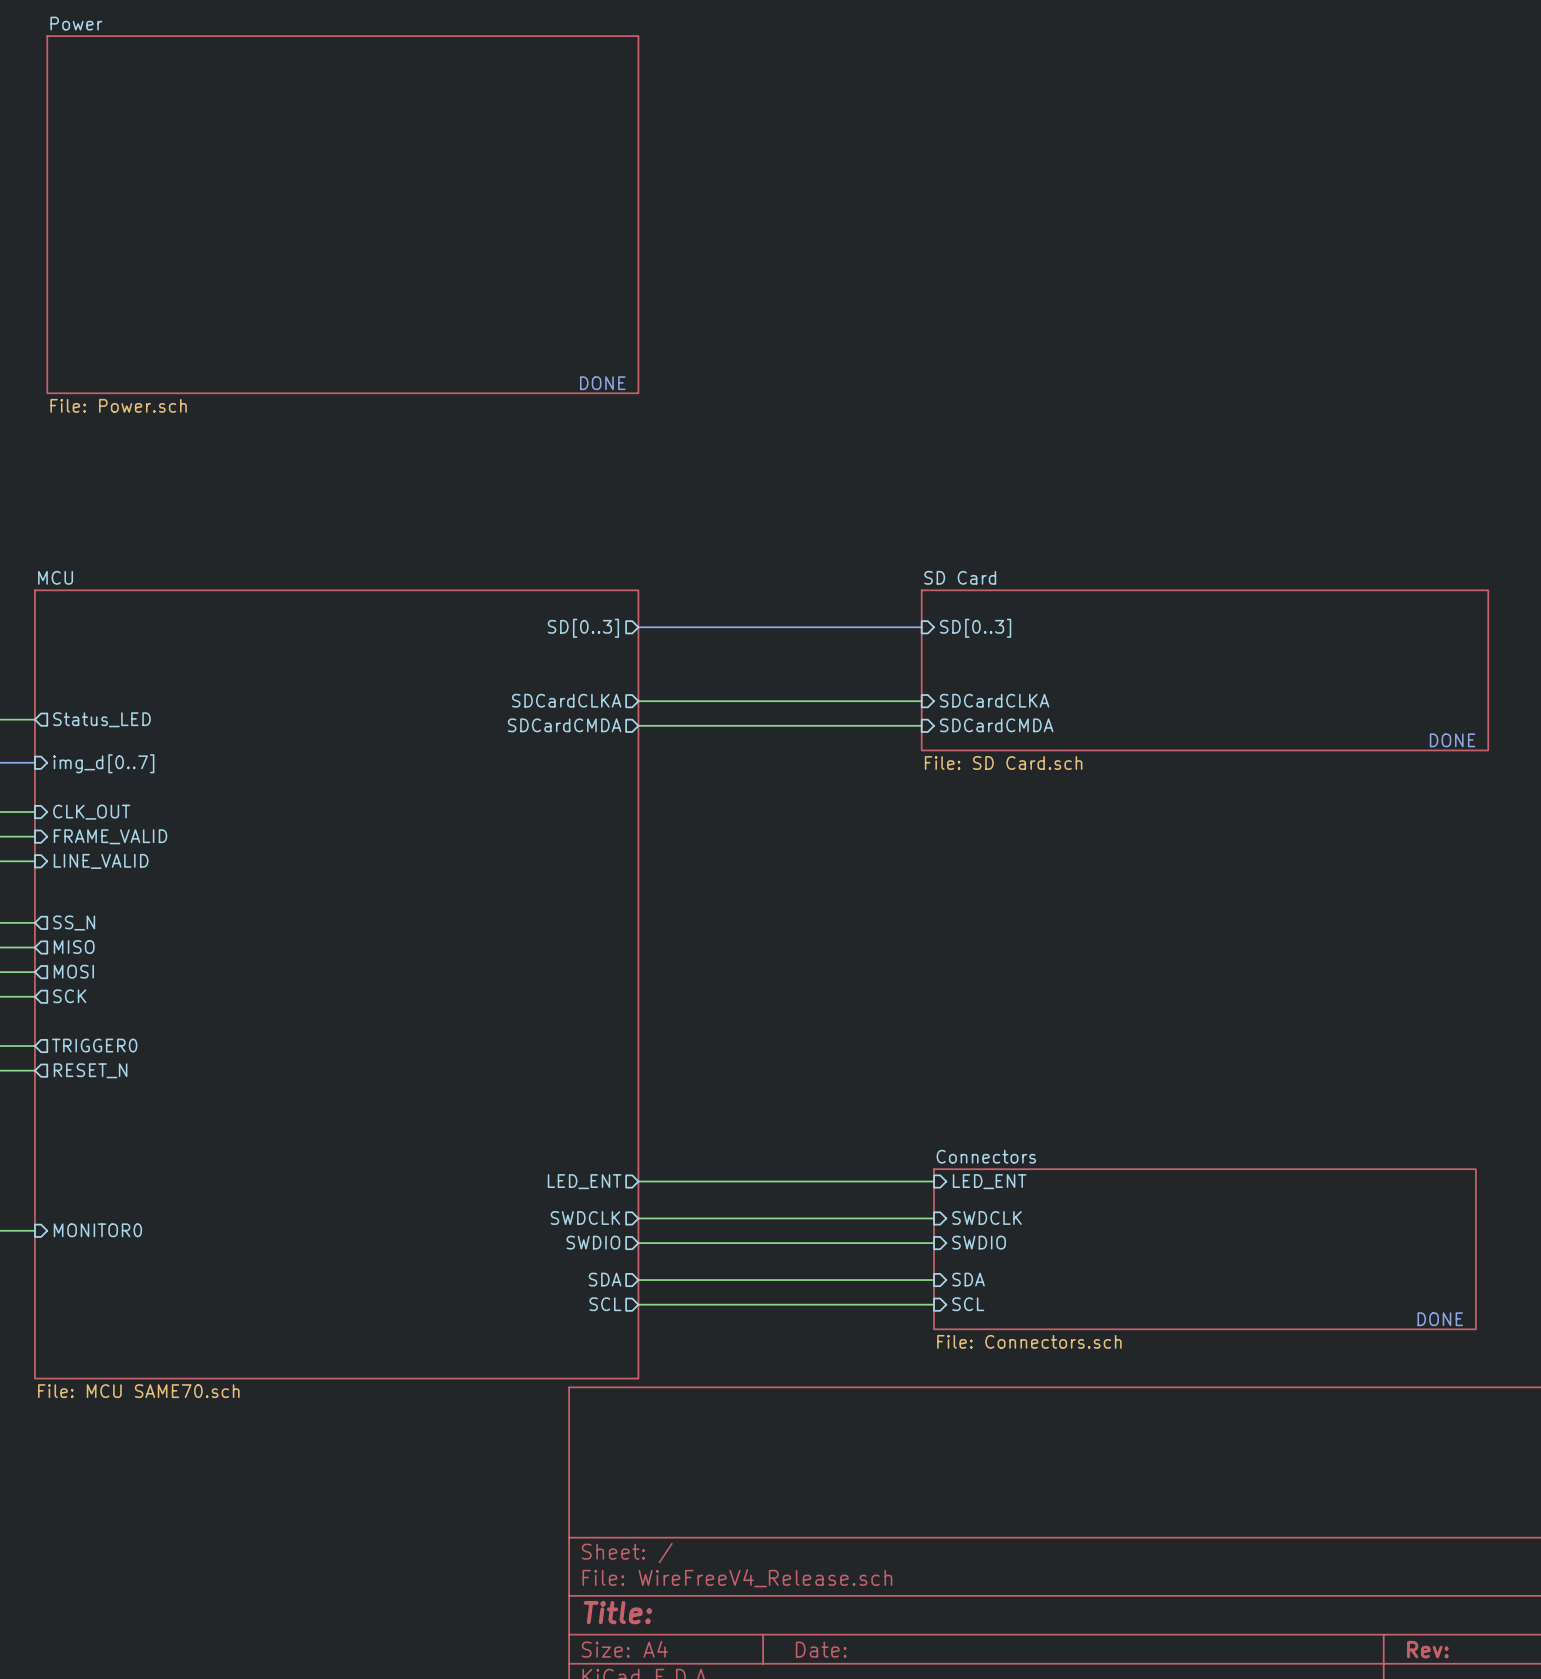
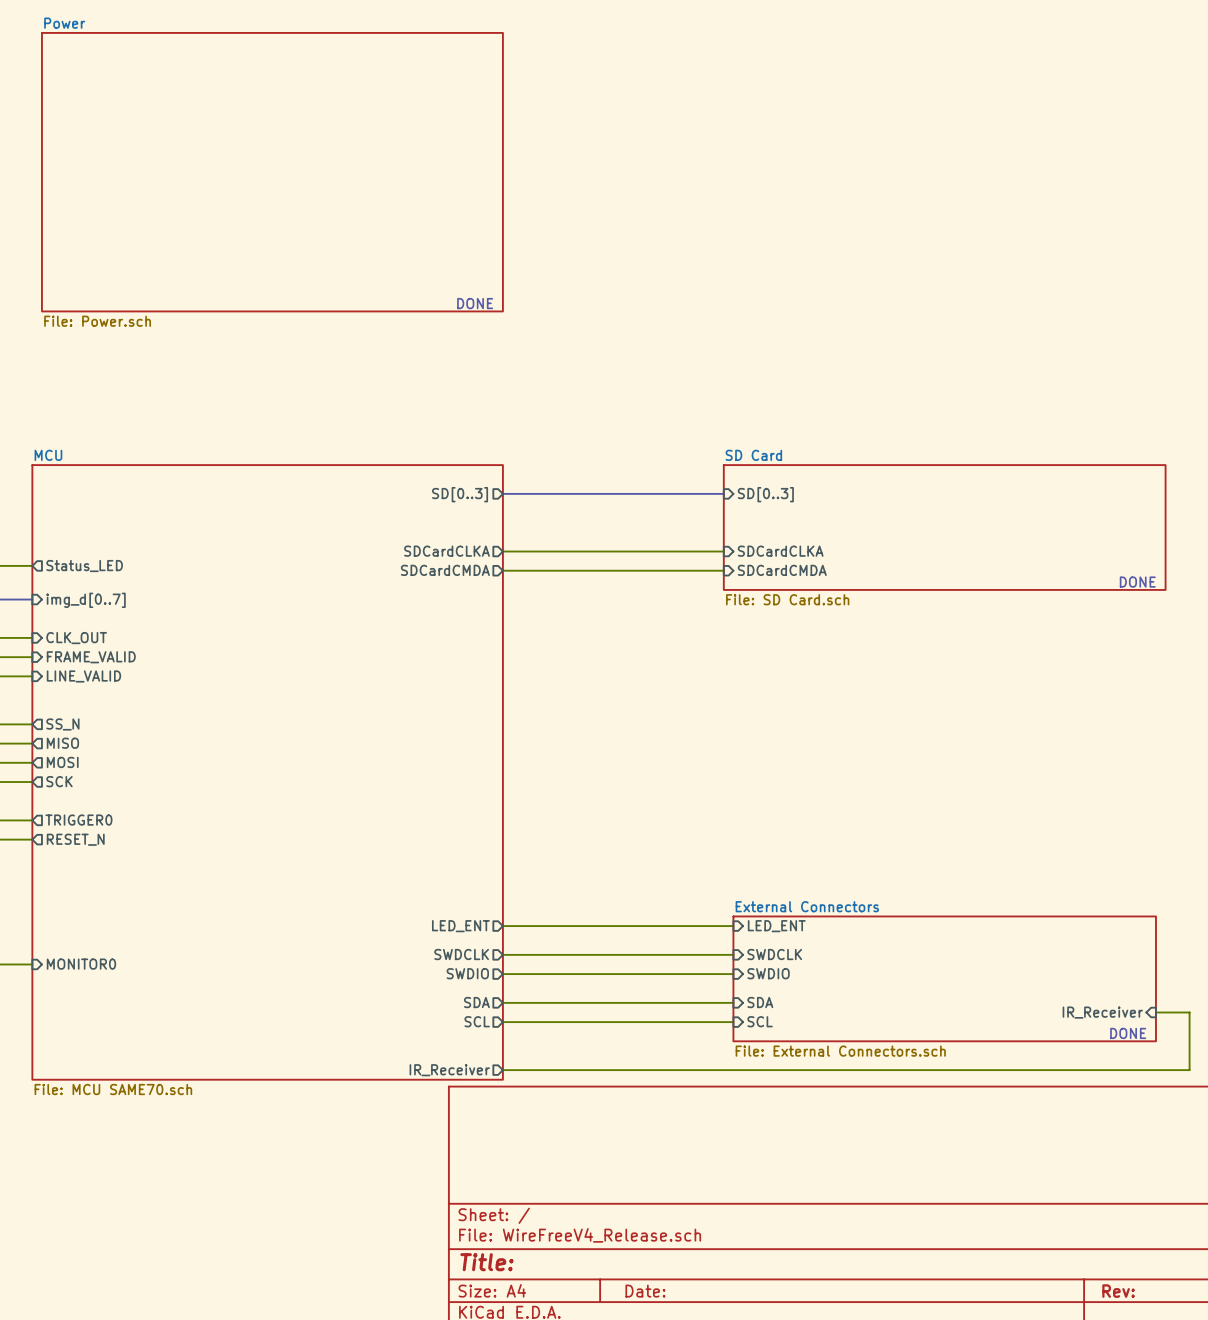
sheet Connectors name: Connectors (986, 1156) -> External Connectors (807, 906)
sheet pin: none -> IR_Receiver (1102, 1012)
wire: none -> (1155, 1012) (1189, 1012) (1189, 1070) (502, 1070)
sheet Connectors value: File: Connectors.sch (1029, 1341) -> File: External Connectors.sch (840, 1051)
sheet pin: none -> IR_Receiver (449, 1070)

